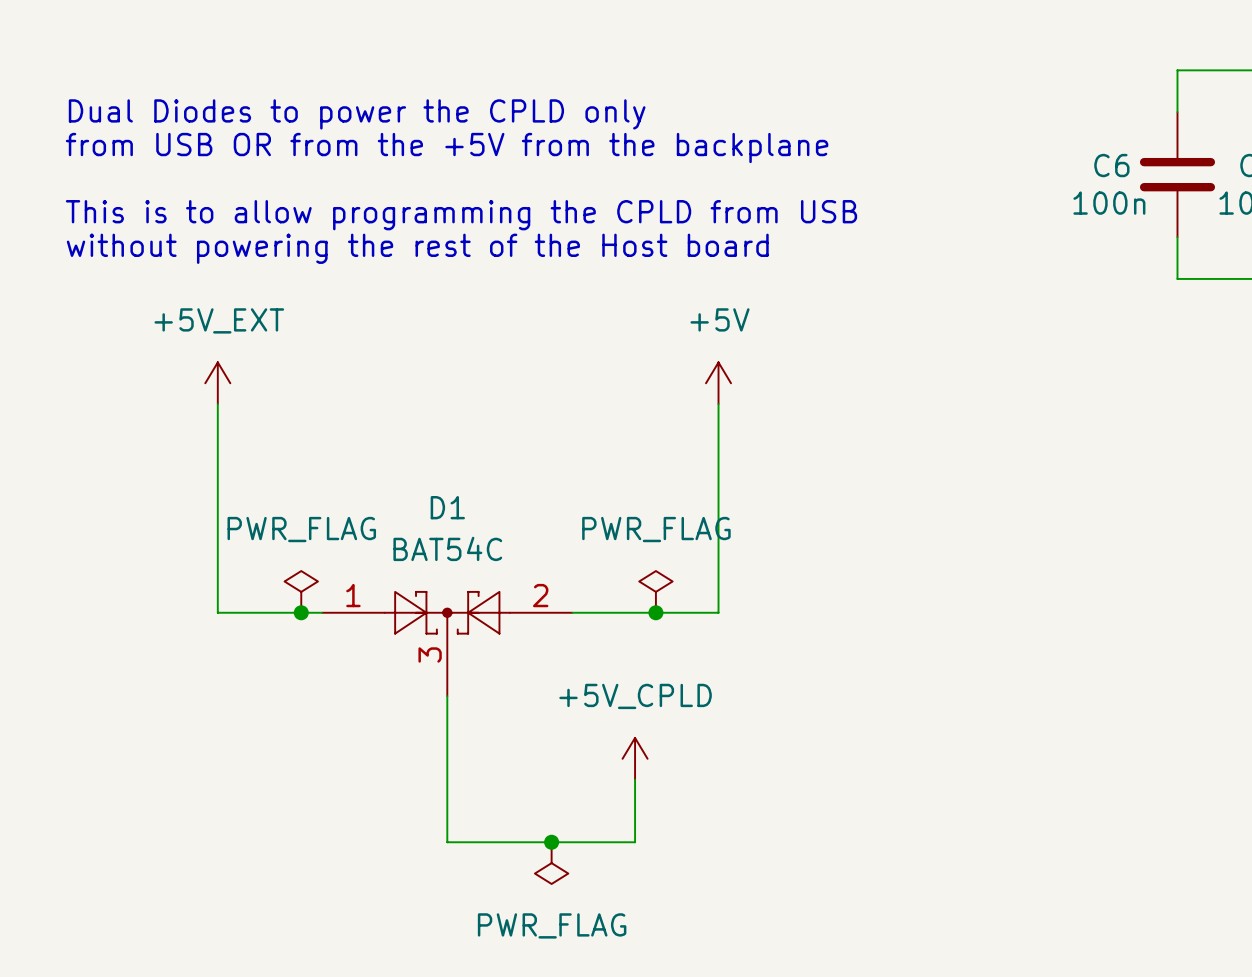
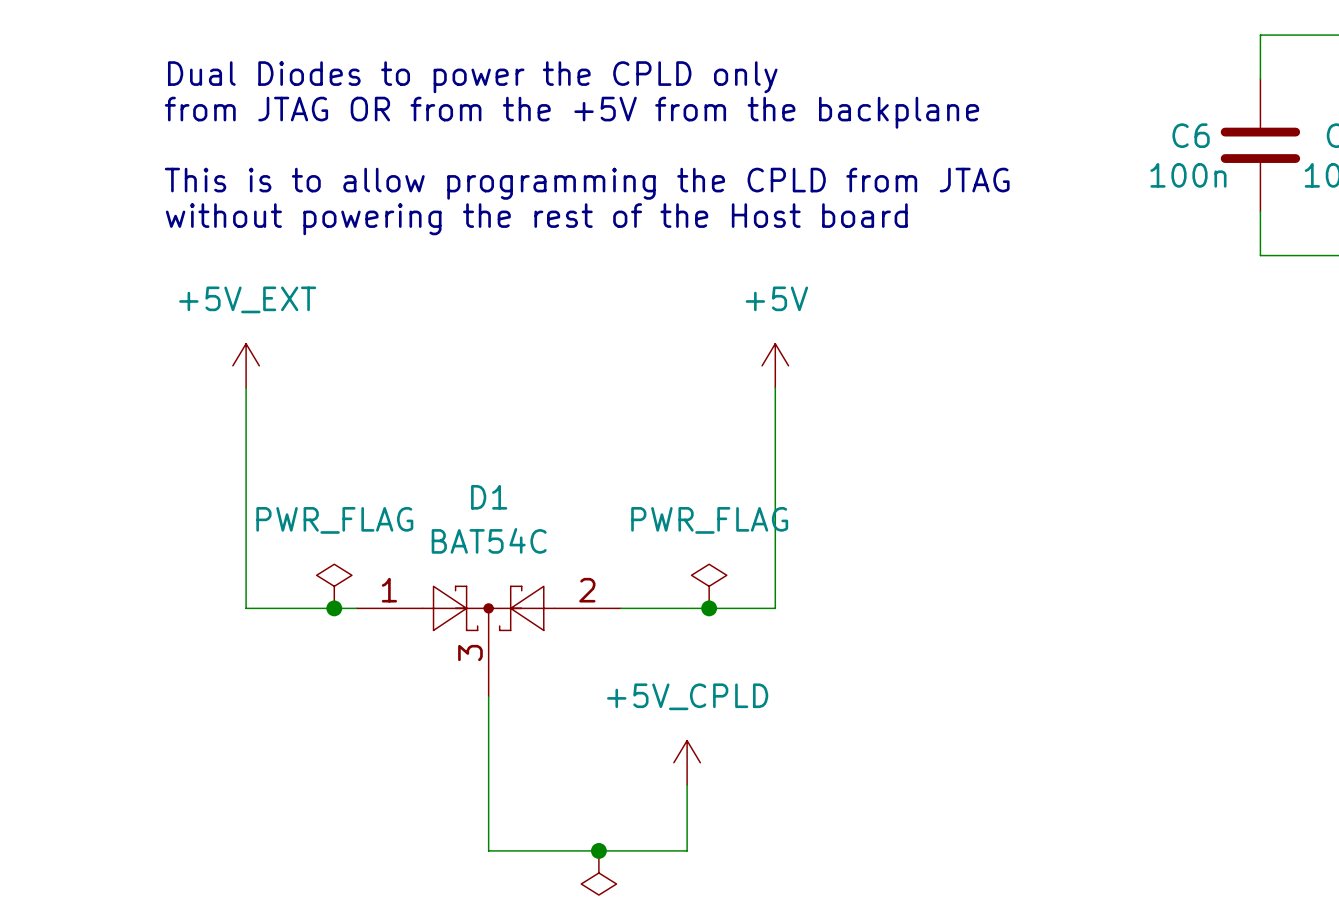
text position: Dual Diodes to power the CPLD only (357, 114) -> Dual Diodes to power the CPLD only (472, 77)
text: from USB OR from the +5V from the backplane (447, 148) -> from JTAG OR from the +5V from the backplane (571, 112)
text: This is to allow programming the CPLD from USB (461, 215) -> This is to allow programming the CPLD from JTAG (587, 183)
text position: without powering the rest of the Host board (417, 248) -> without powering the rest of the Host board (536, 219)

